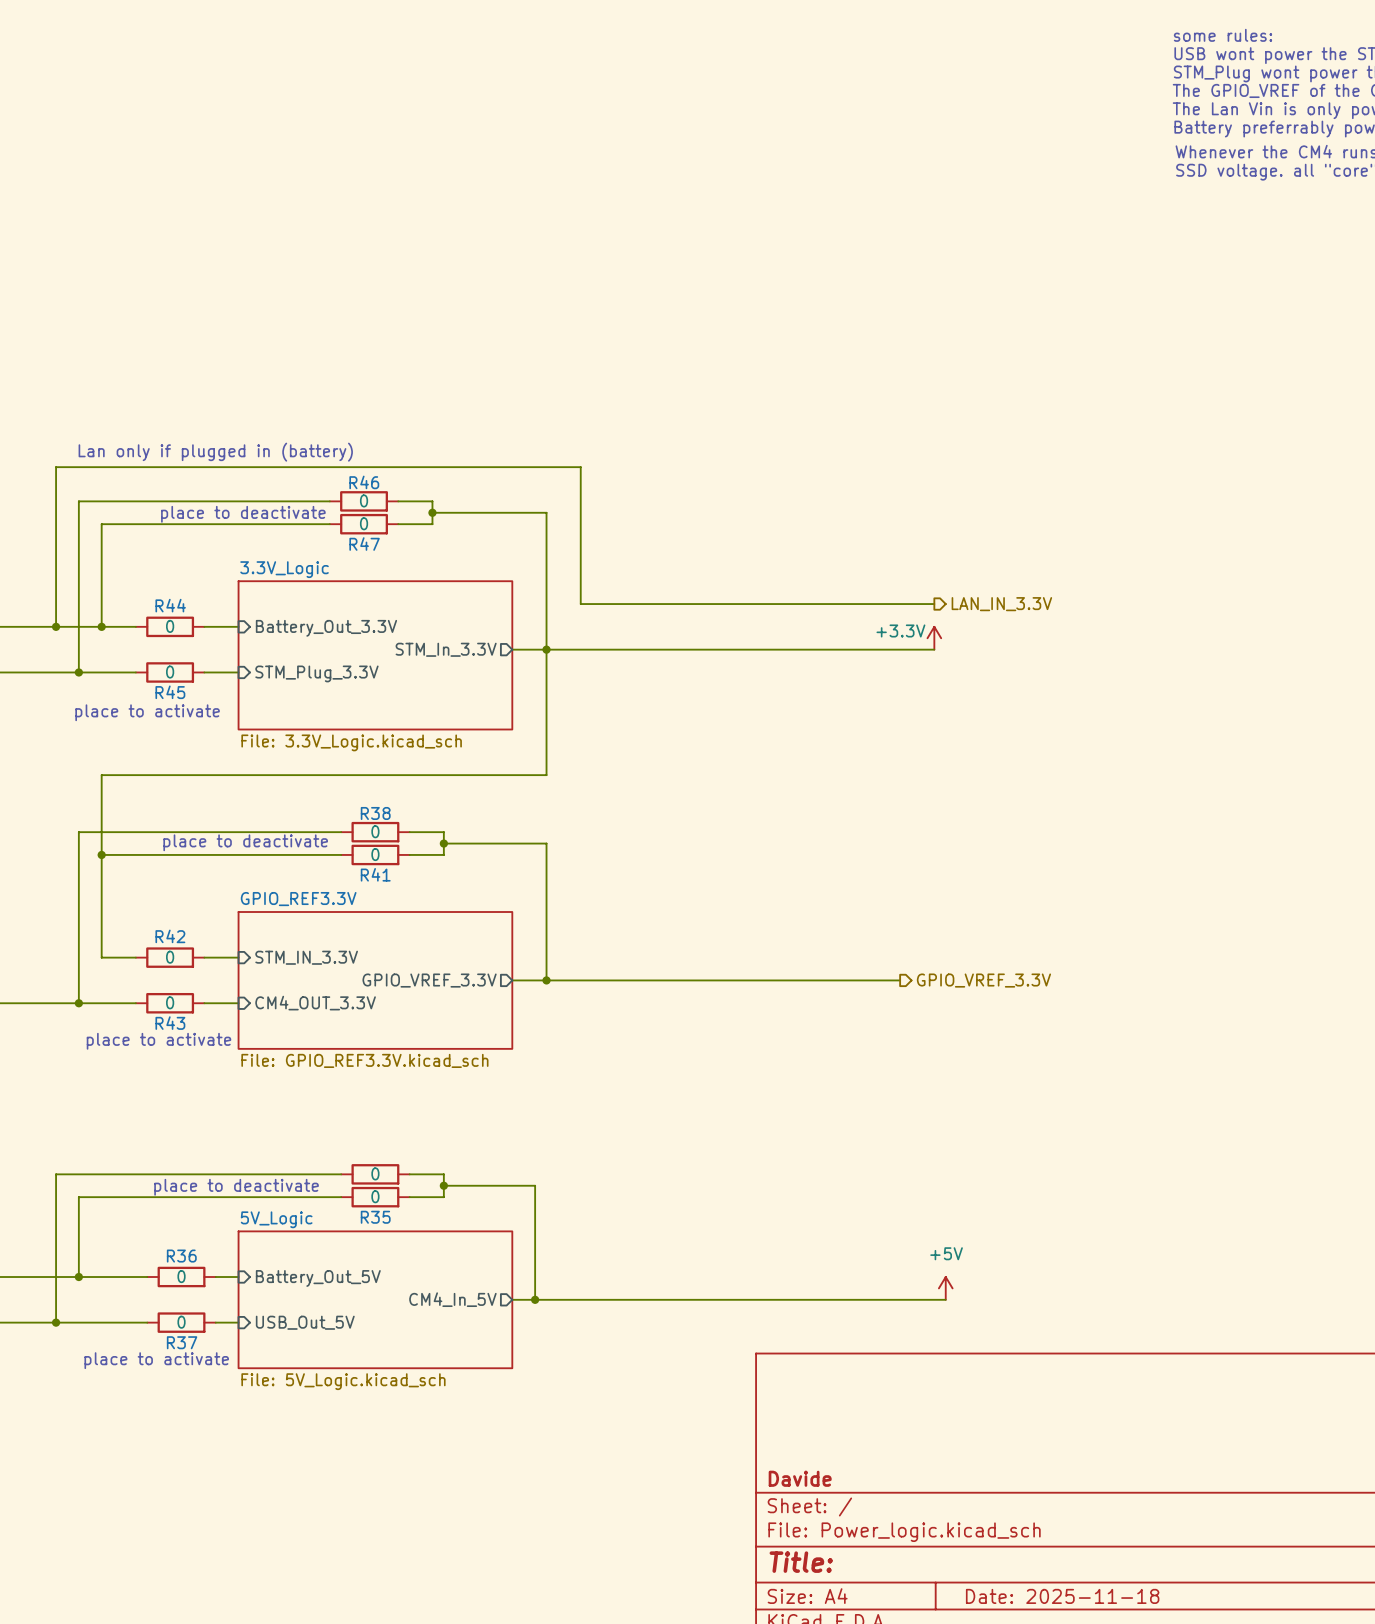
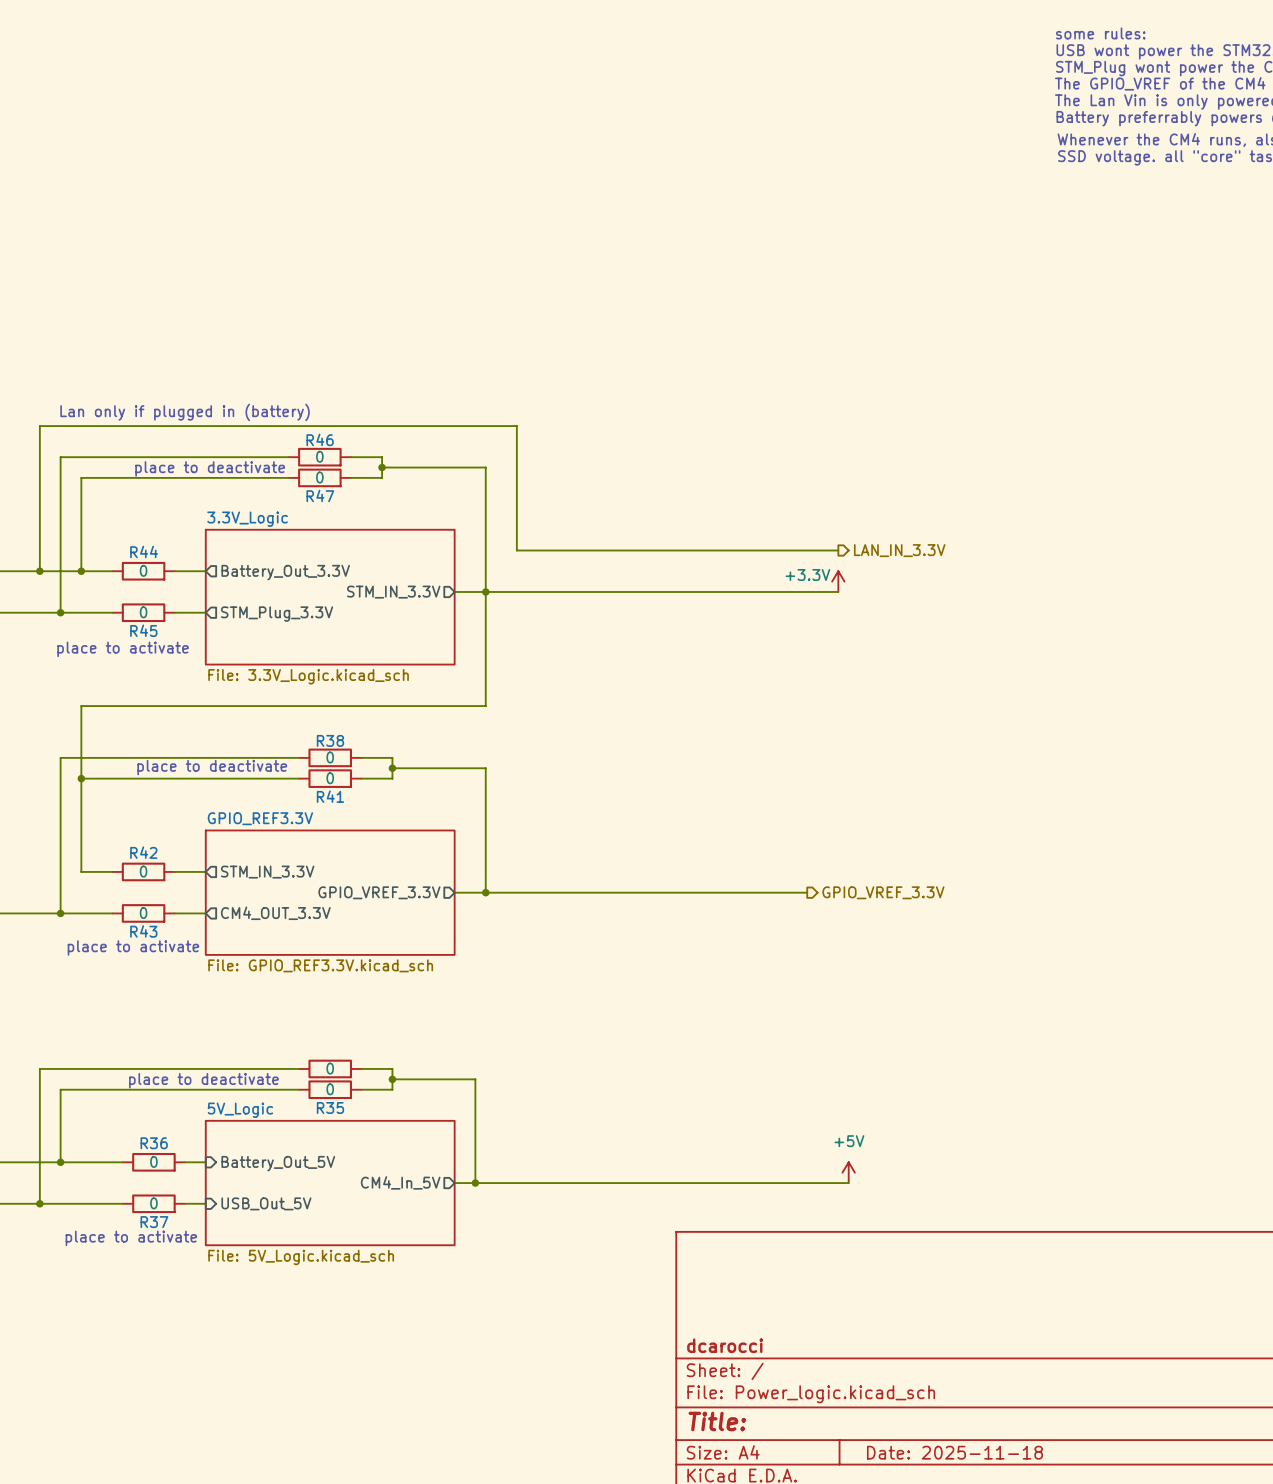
sheet pin shape: input (326, 628) -> output (285, 572)
sheet pin: STM_In_3.3V (446, 649) -> STM_IN_3.3V (393, 592)
sheet pin shape: input (316, 673) -> output (277, 614)
sheet pin shape: input (306, 957) -> output (267, 872)
sheet pin shape: input (315, 1003) -> output (275, 913)
title block: Davide (800, 1478) -> dcarocci (725, 1345)

